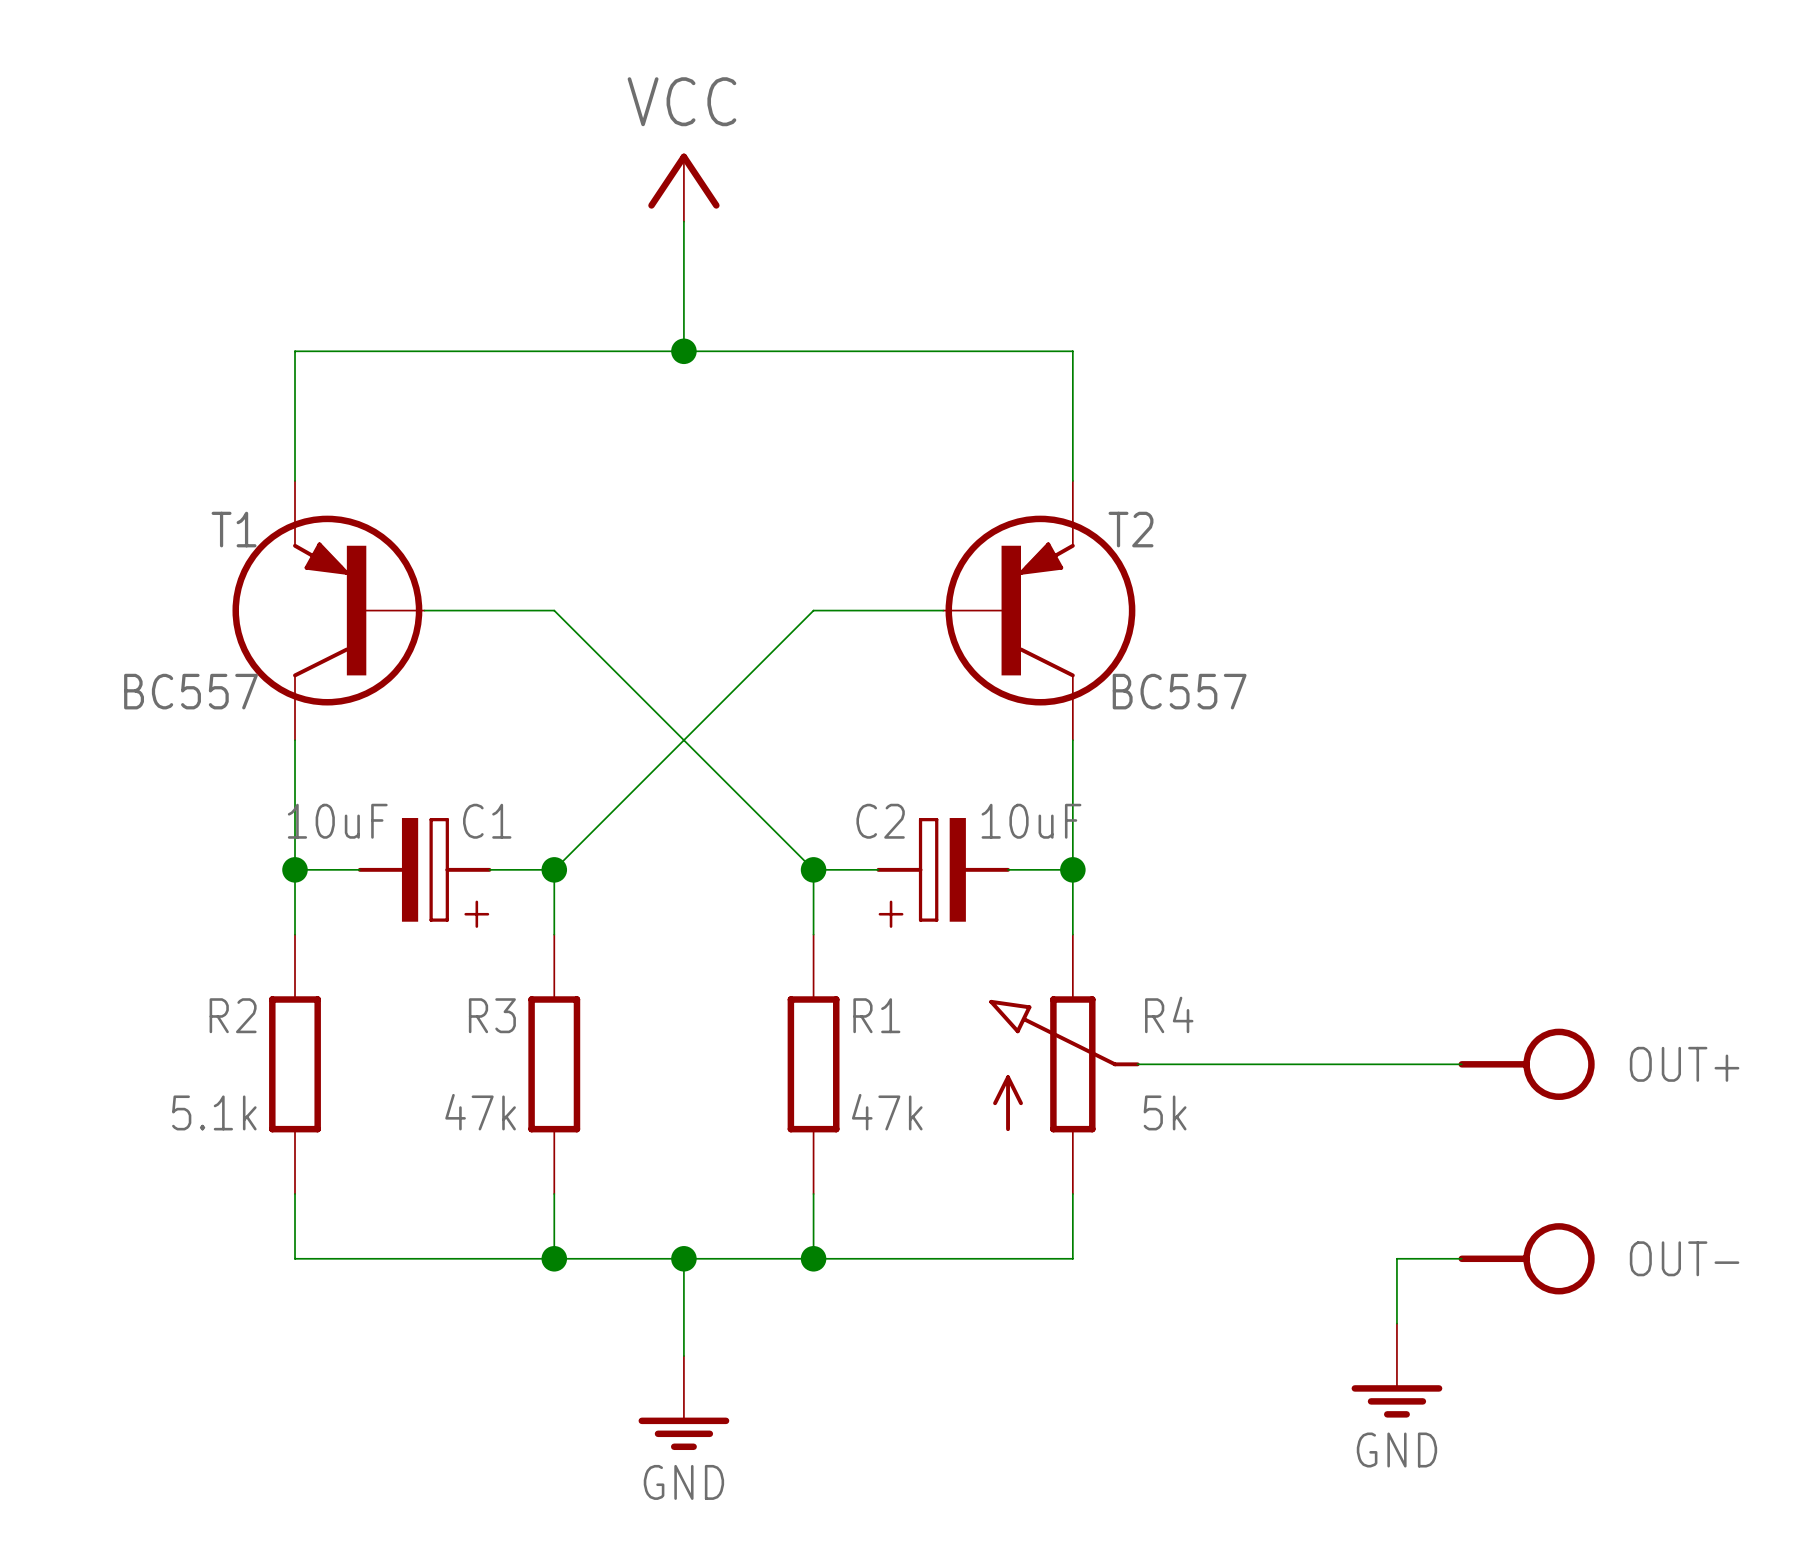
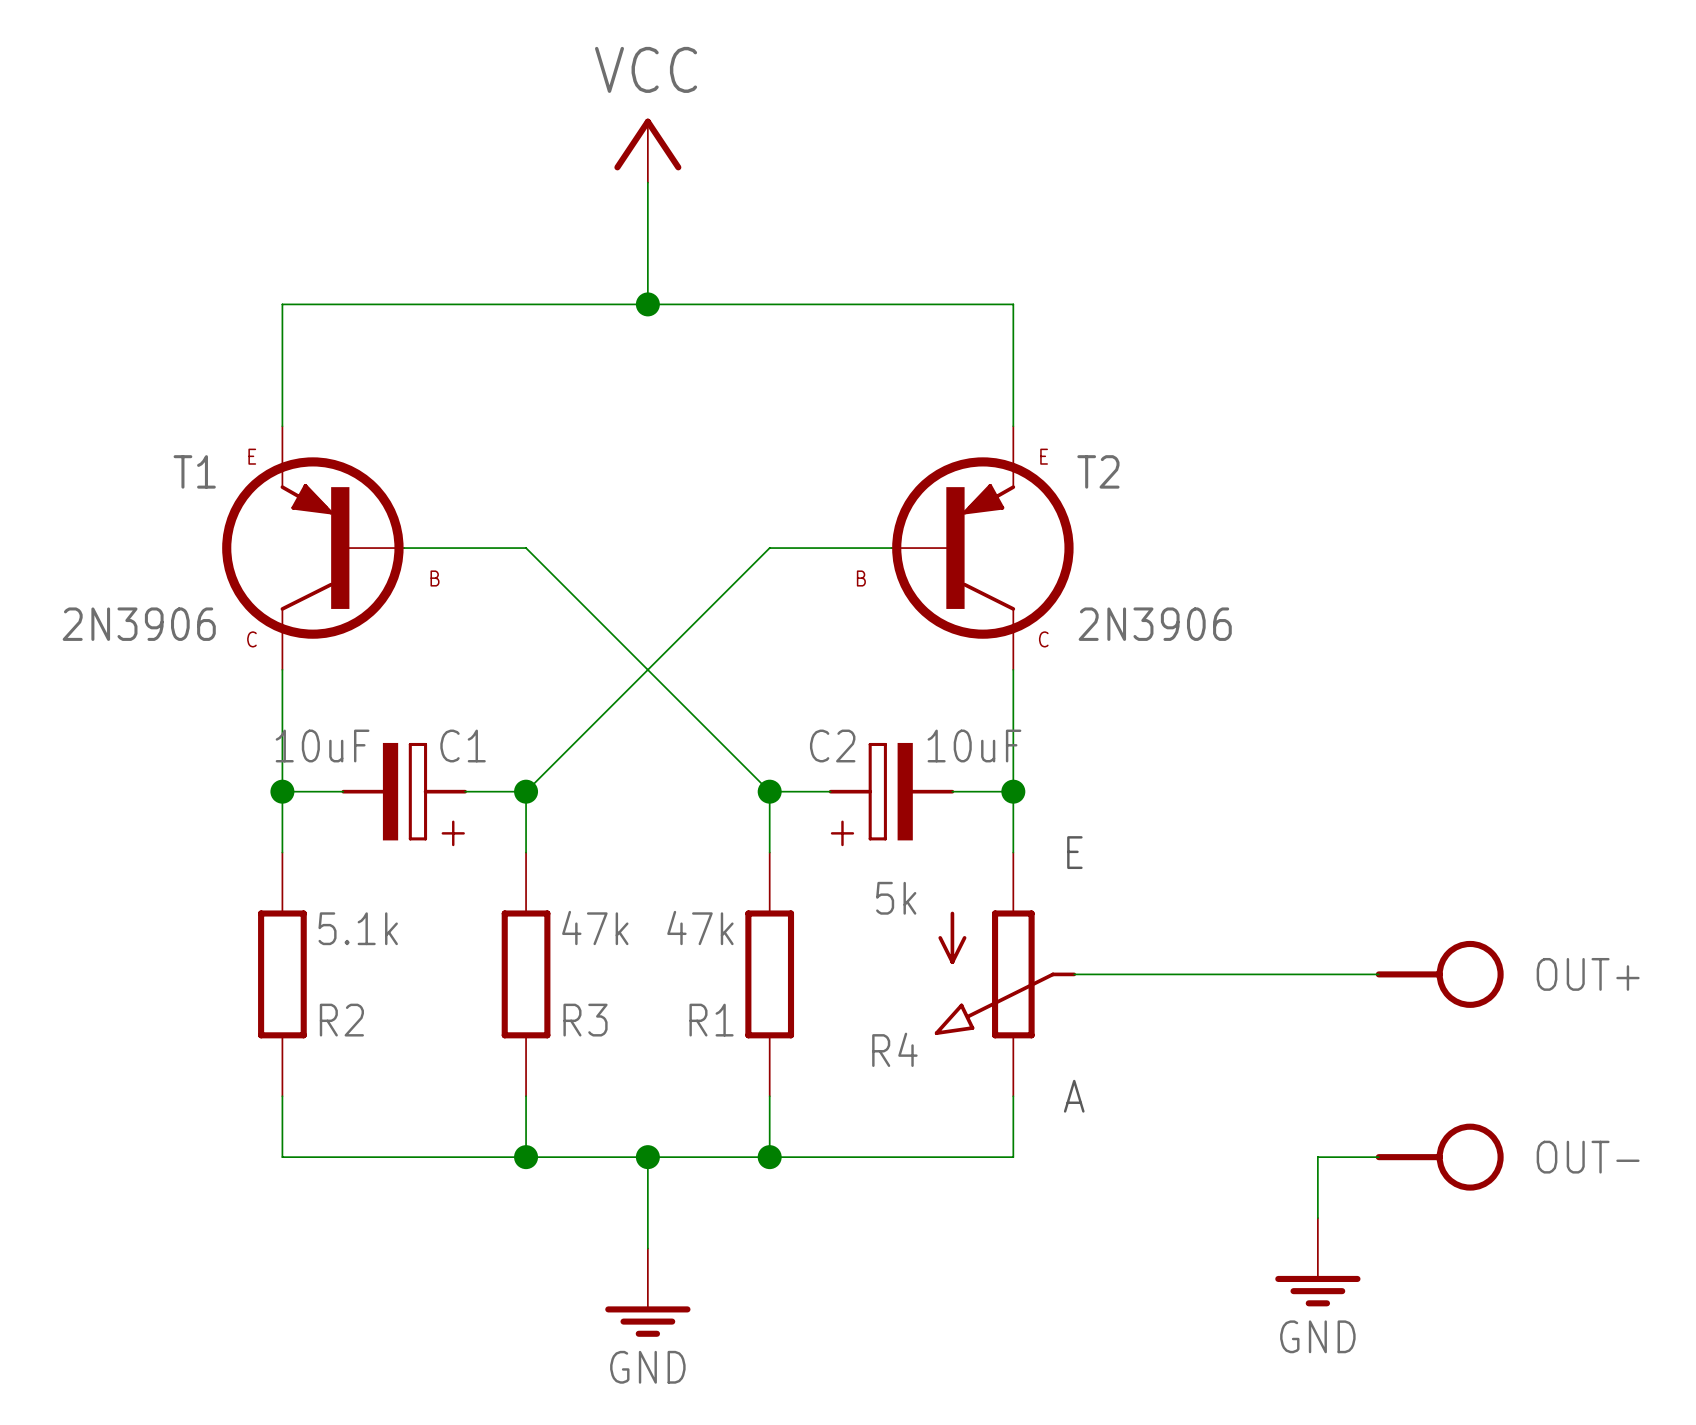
T1 symbol: [232, 480, 425, 741] -> [222, 426, 405, 670]
T2 symbol: [943, 480, 1136, 741] -> [891, 426, 1074, 670]
T1 value: BC557 (191, 691) -> 2N3906 (139, 624)
T2 value: BC557 (1179, 691) -> 2N3906 (1155, 624)
R4 symbol: [989, 934, 1140, 1194] -> [934, 852, 1077, 1097]
R4 name position: R4 (1169, 1014) -> R4 (894, 1049)
R2 name position: R2 (233, 1015) -> R2 (341, 1020)
R3 name position: R3 (492, 1015) -> R3 (585, 1020)
R1 name position: R1 (876, 1015) -> R1 (711, 1020)
R2 value position: 5.1k (214, 1112) -> 5.1k (358, 928)
R3 value position: 47k (480, 1112) -> 47k (595, 928)
R1 value position: 47k (887, 1112) -> 47k (700, 928)
R4 value position: 5k (1165, 1112) -> 5k (896, 898)

